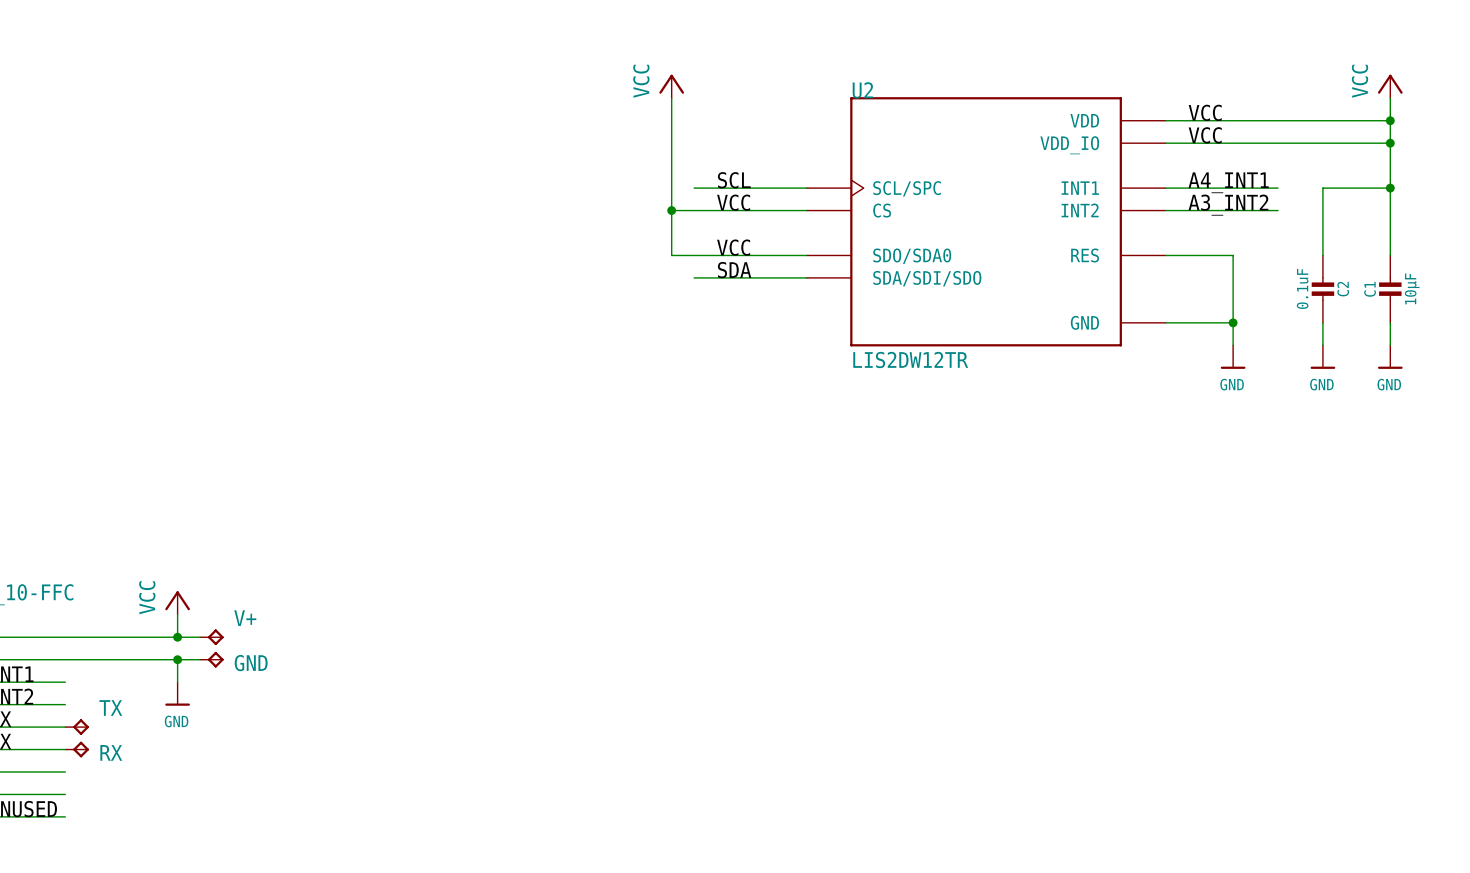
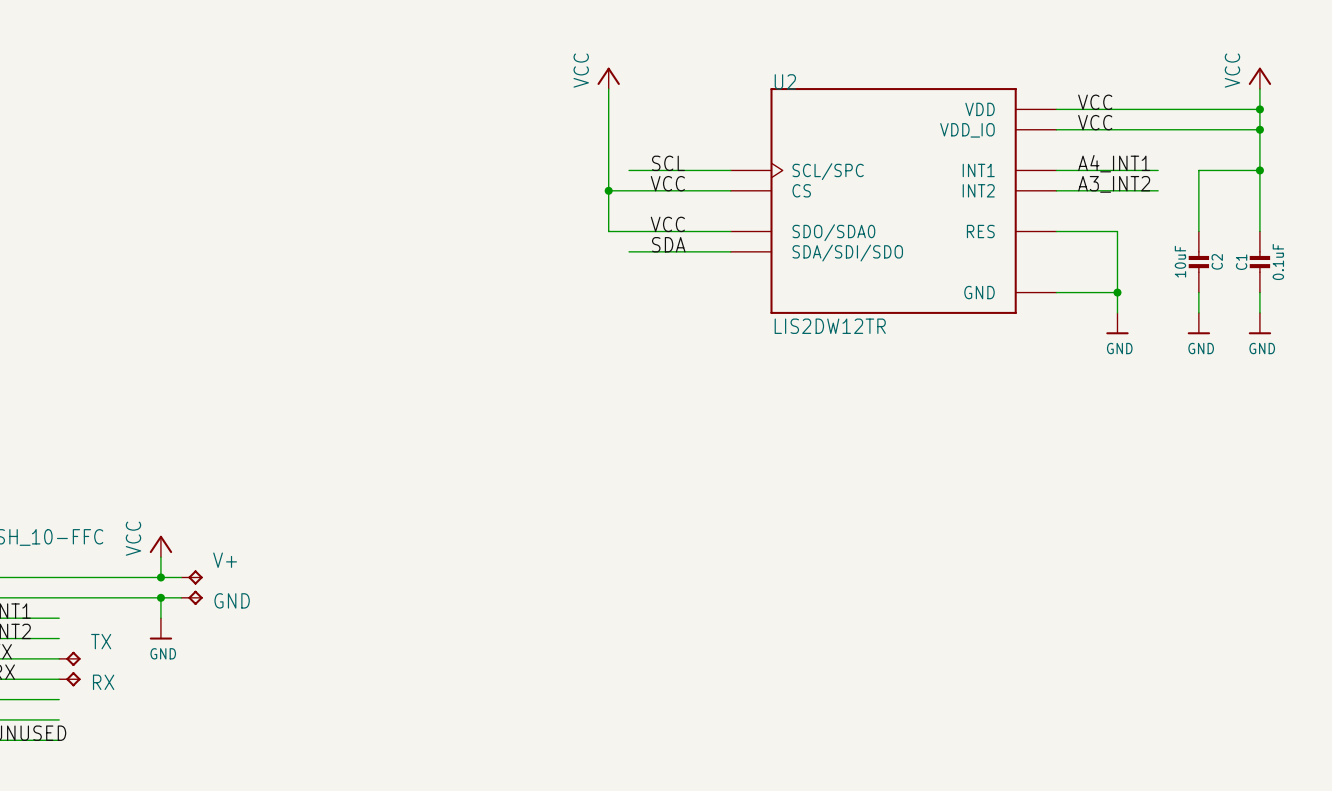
C2 value: 0.1uF (1302, 288) -> 10uF (1180, 261)
C1 value: 10µF (1412, 288) -> 0.1uF (1278, 261)

